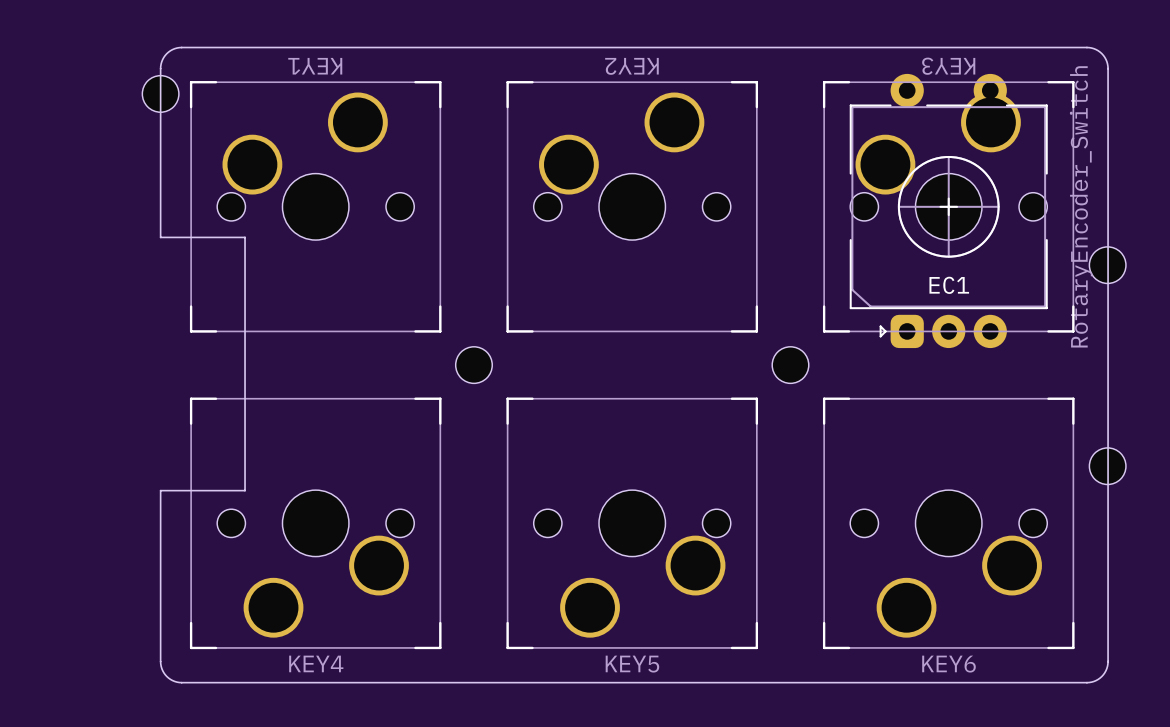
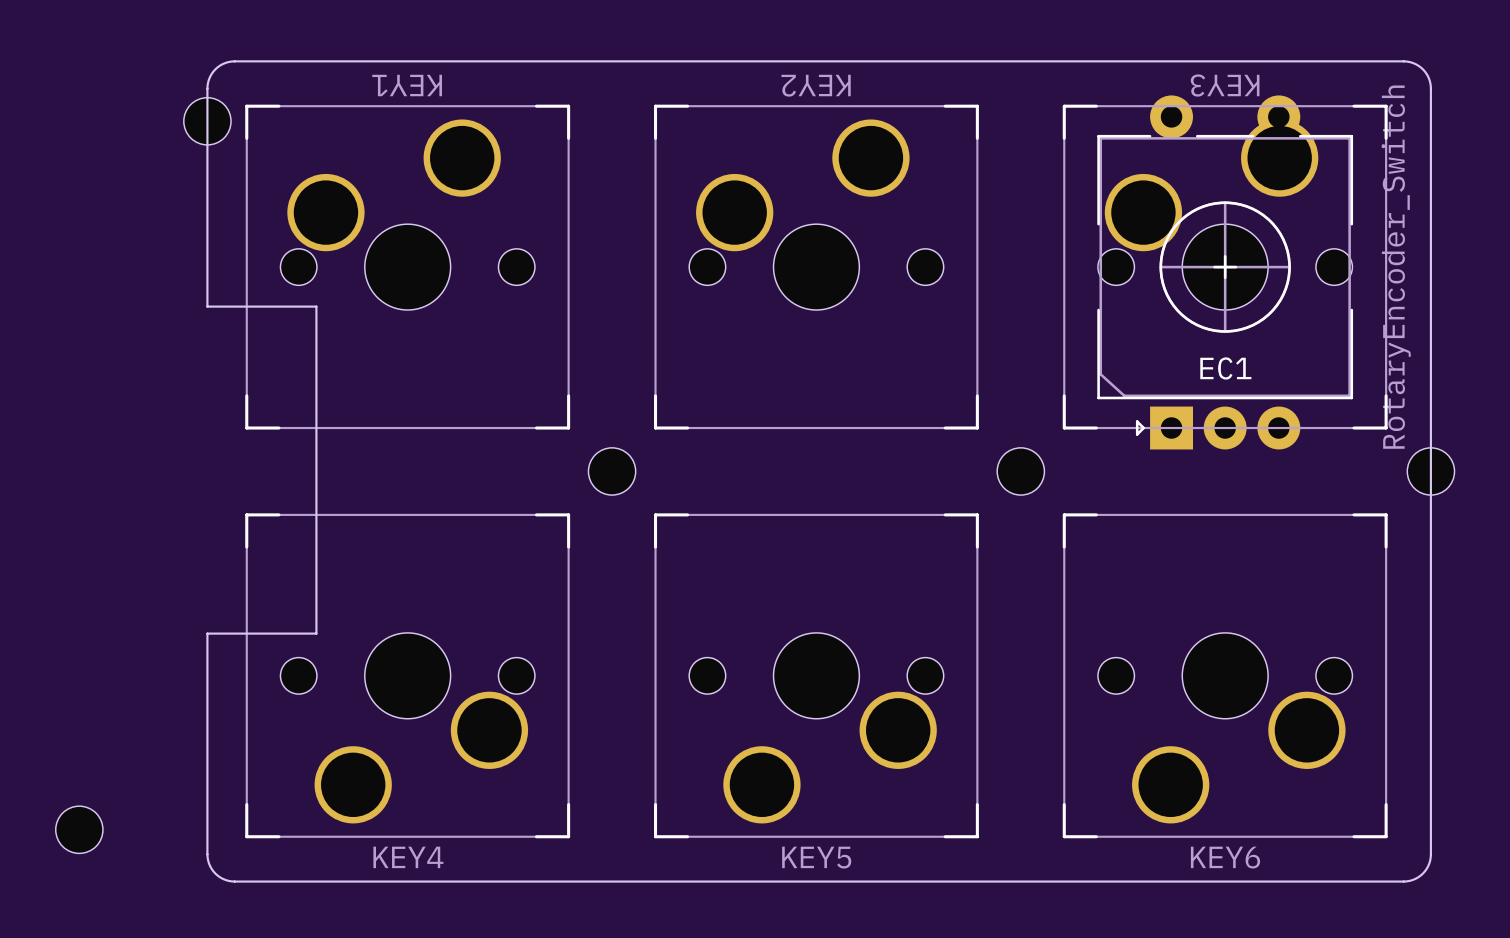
EC1 footprint: [849, 73, 1048, 349] -> [1097, 95, 1354, 450]
part: (1107, 265) -> none
part: none -> (1430, 471)
part: (1107, 466) -> none
part: none -> (79, 829)

